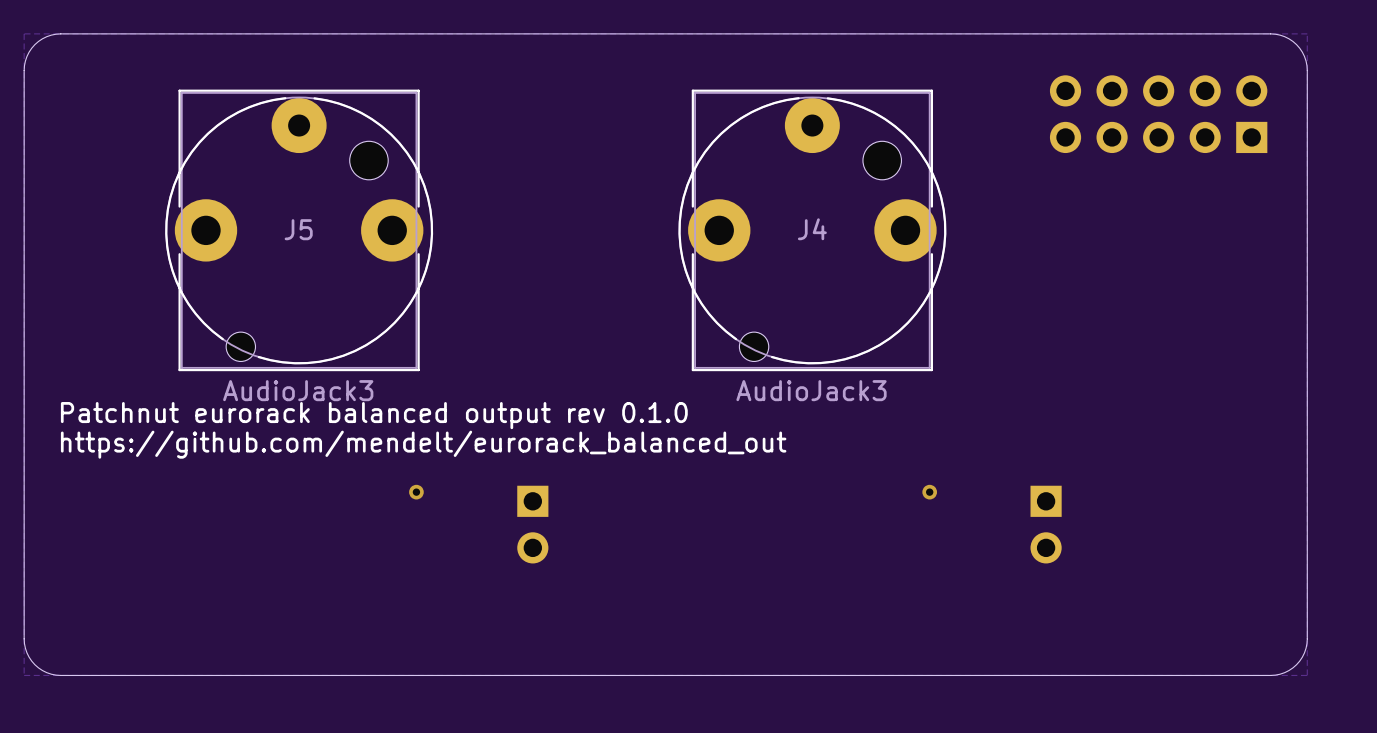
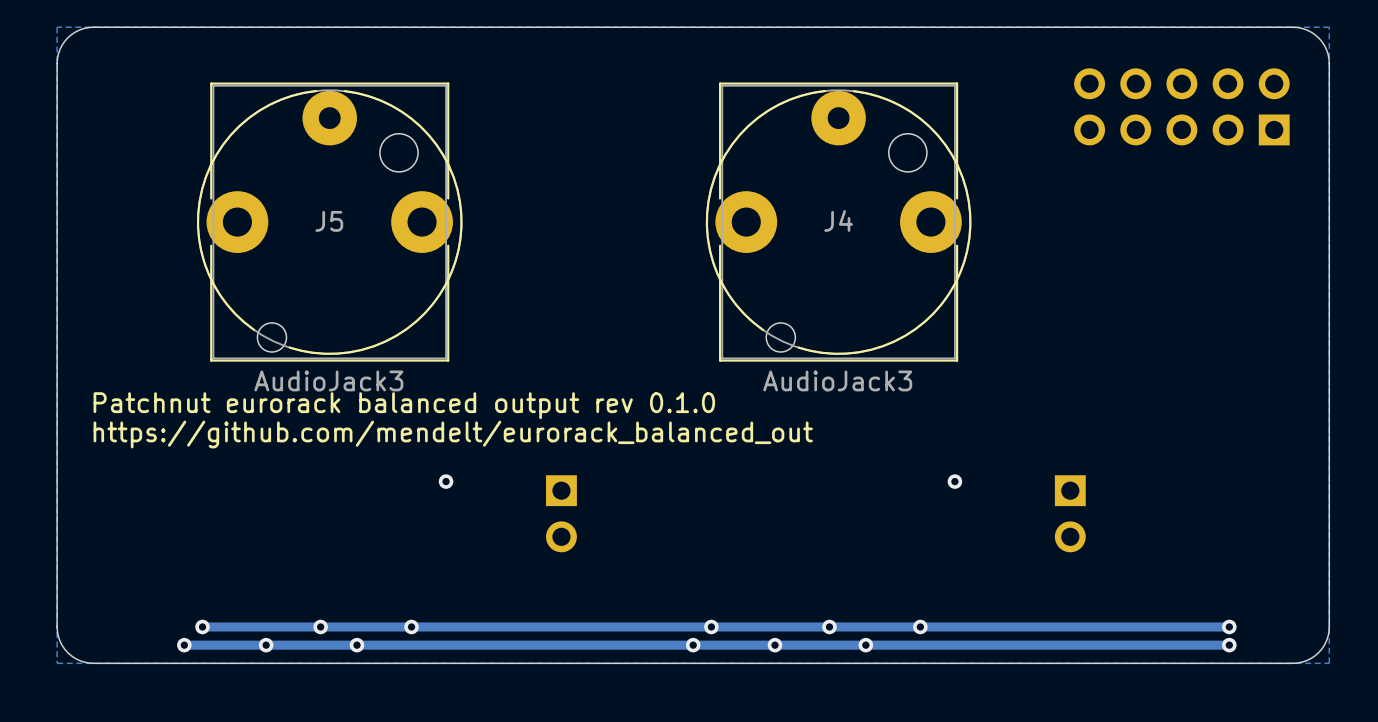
via: none -> (202, 626)
via: none -> (320, 626)
via: none -> (411, 626)
via: none -> (711, 626)
via: none -> (829, 626)
via: none -> (920, 626)
track: none -> (1229, 626) (202, 626)
via: none -> (1229, 626)
via: none -> (184, 645)
via: none -> (266, 645)
via: none -> (357, 645)
via: none -> (693, 645)
via: none -> (774, 645)
via: none -> (865, 645)
track: none -> (1229, 645) (184, 645)
via: none -> (1229, 645)

